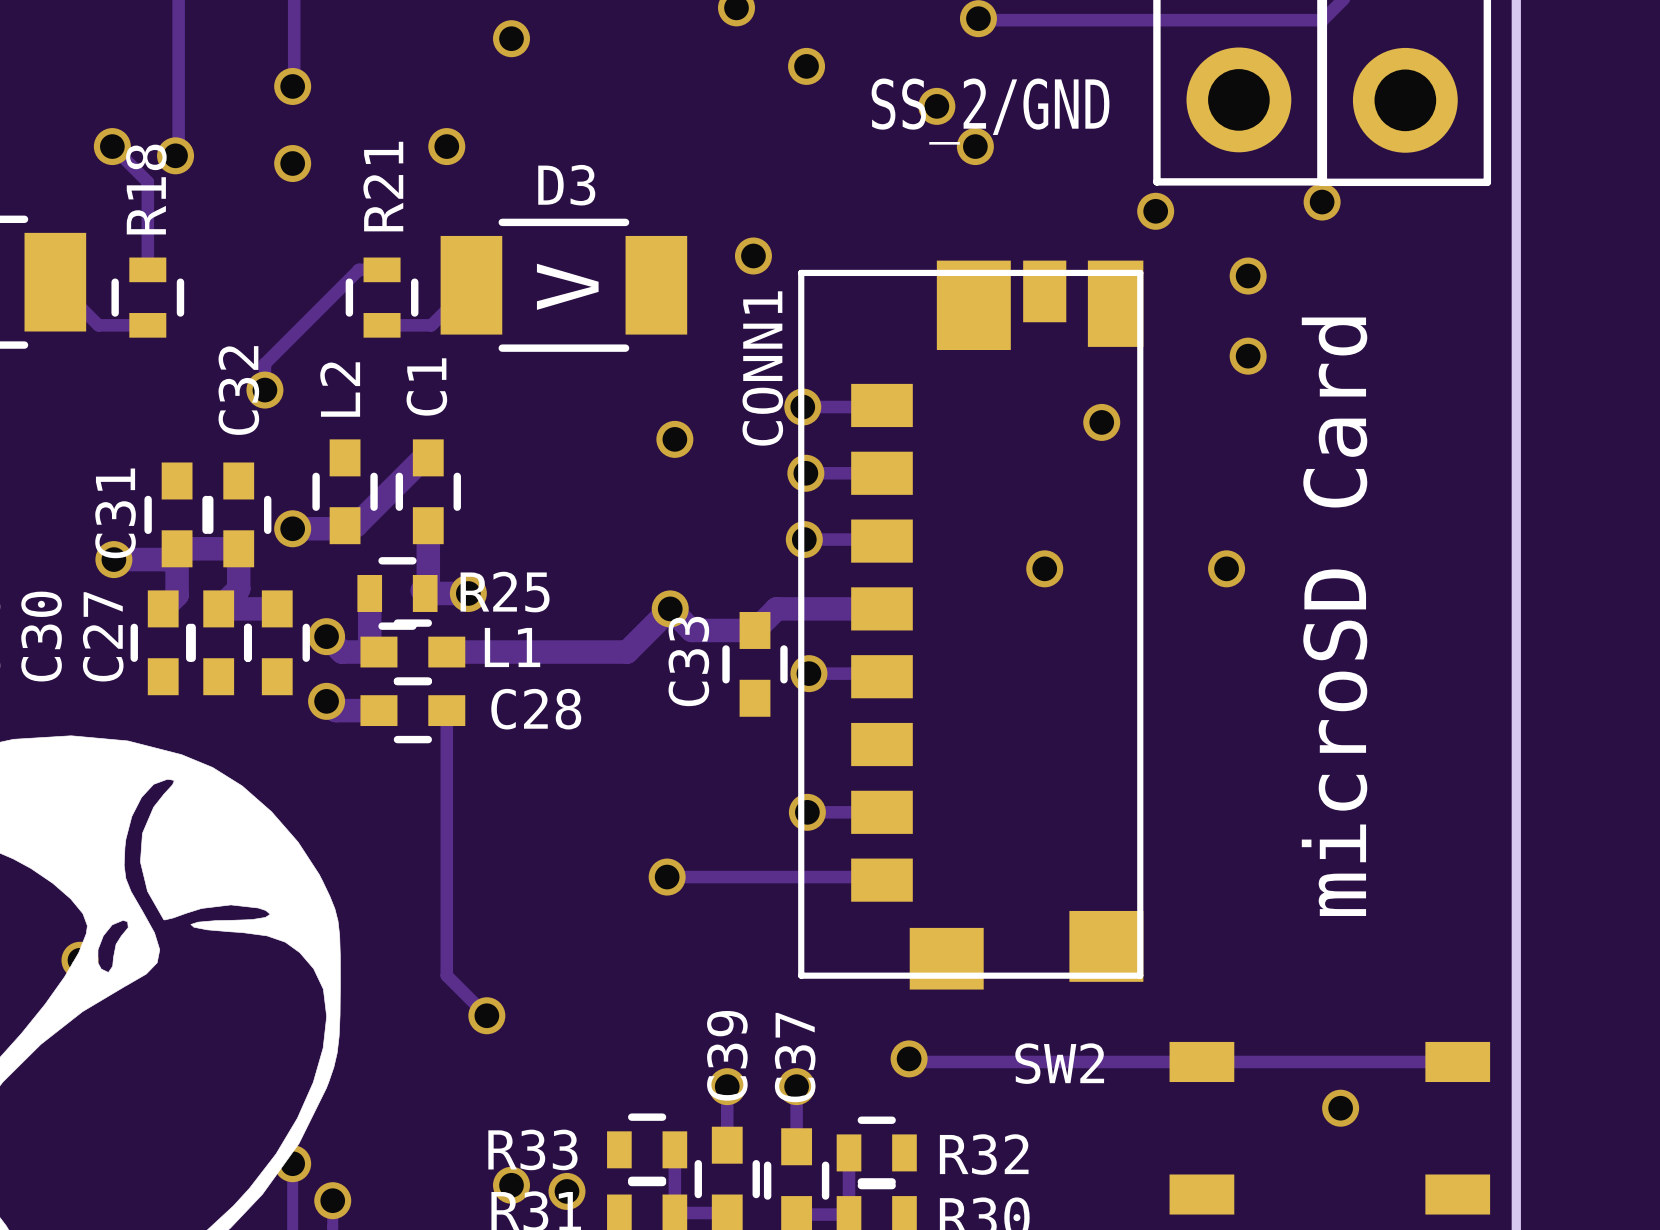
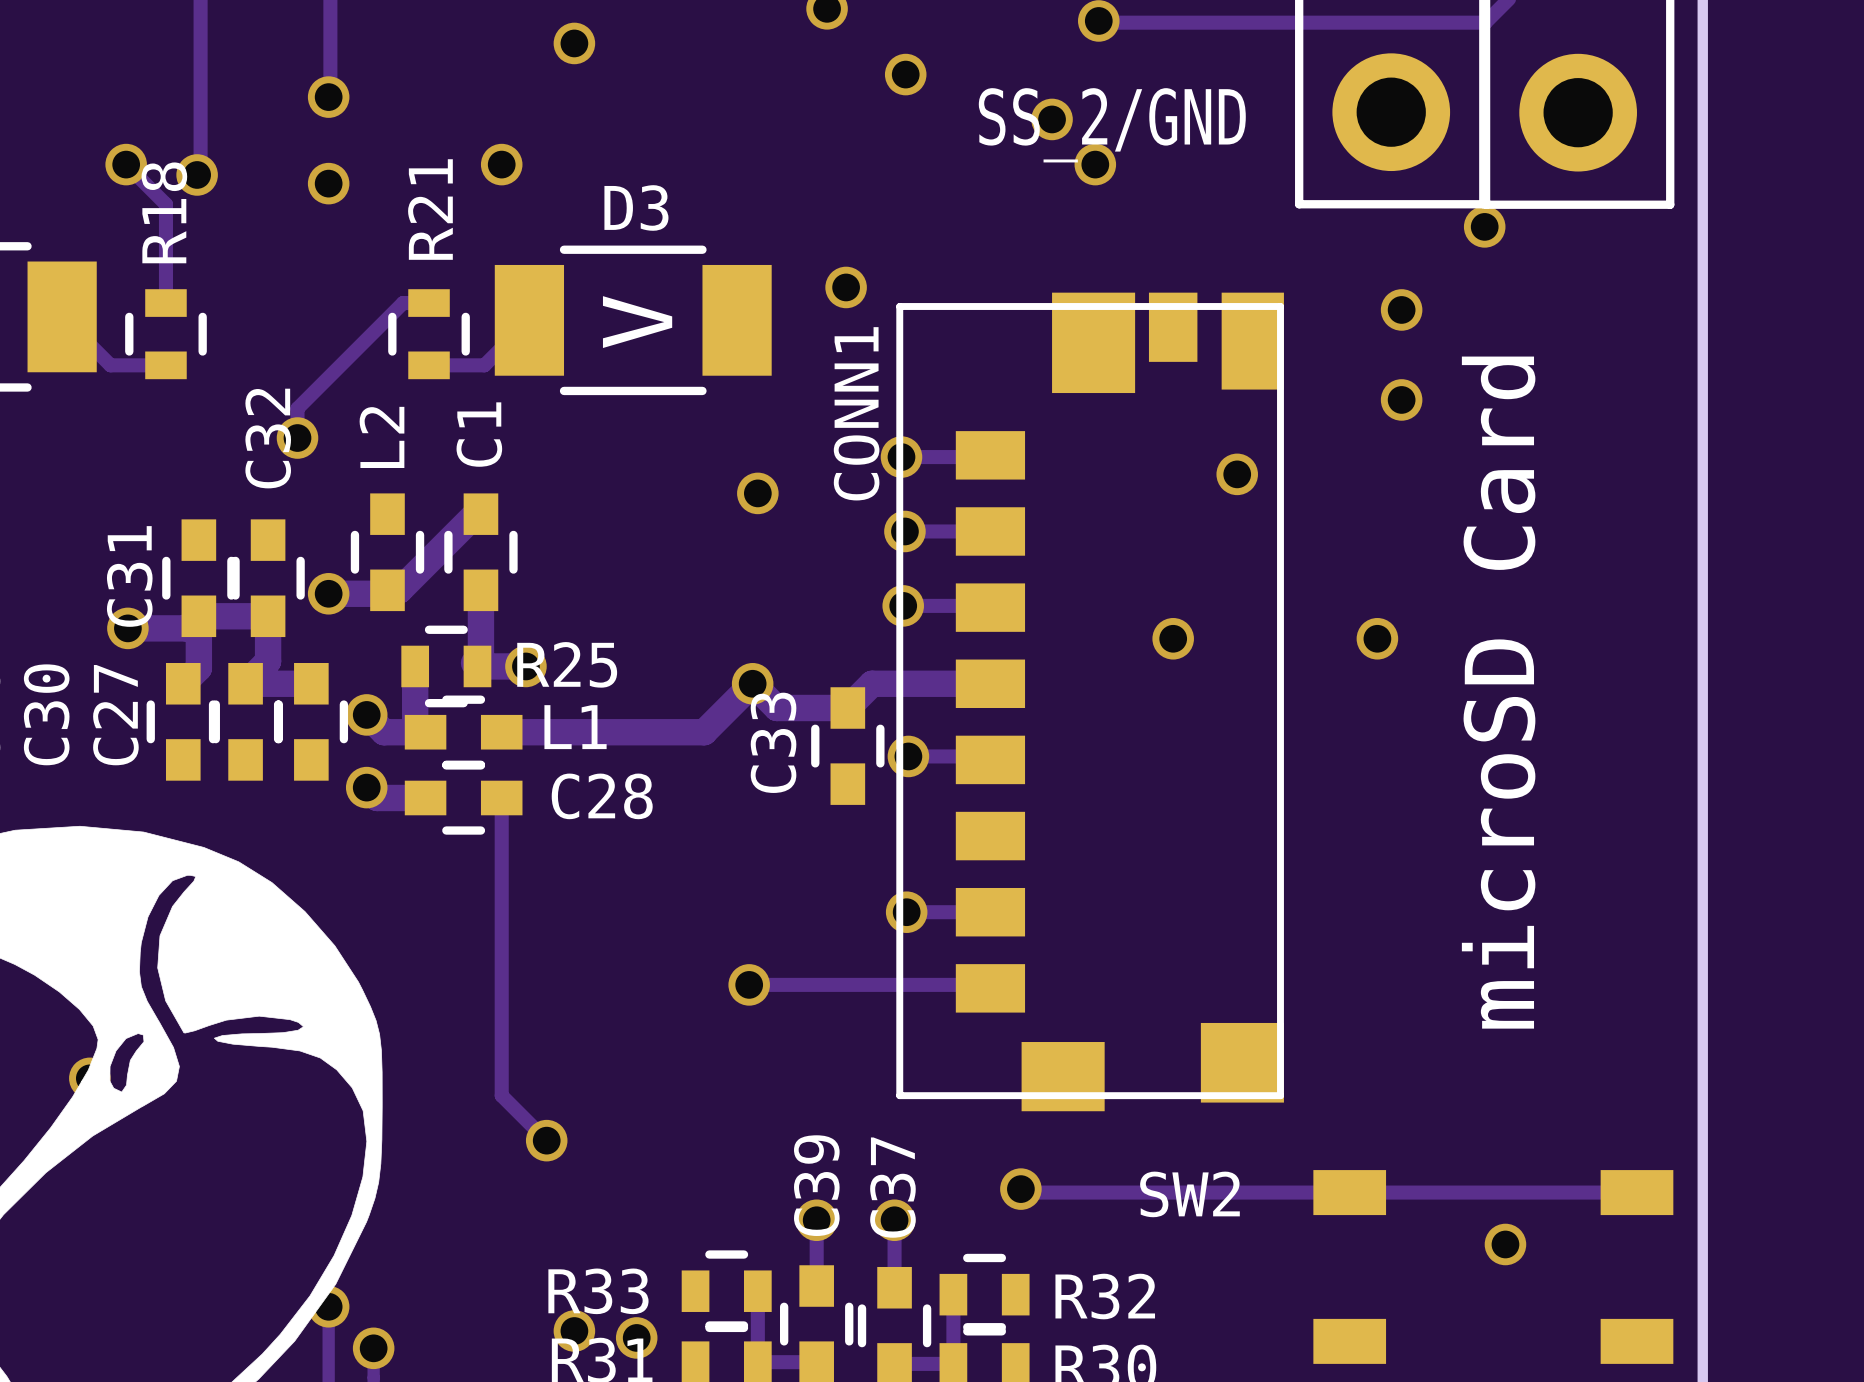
via: (1155, 211) -> none

